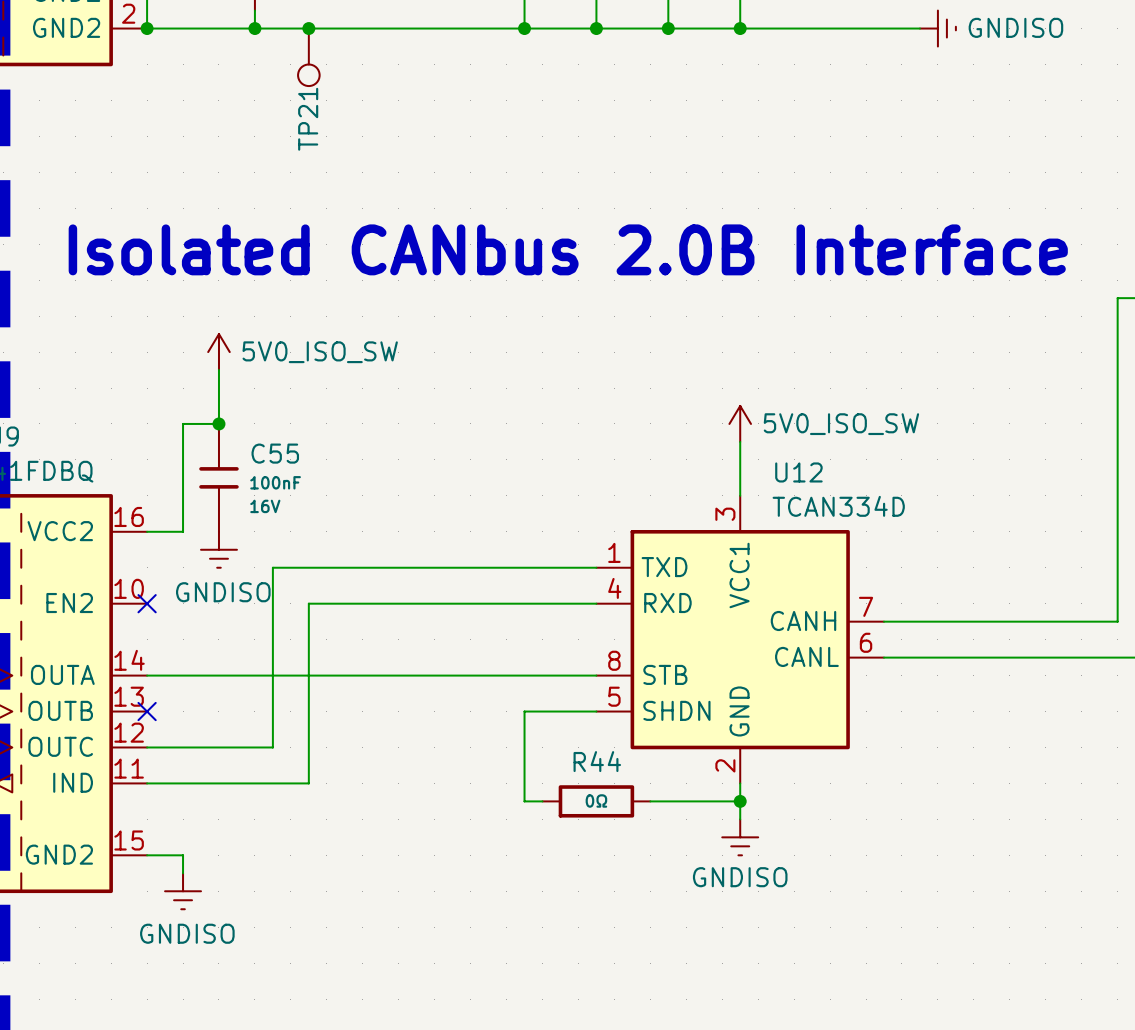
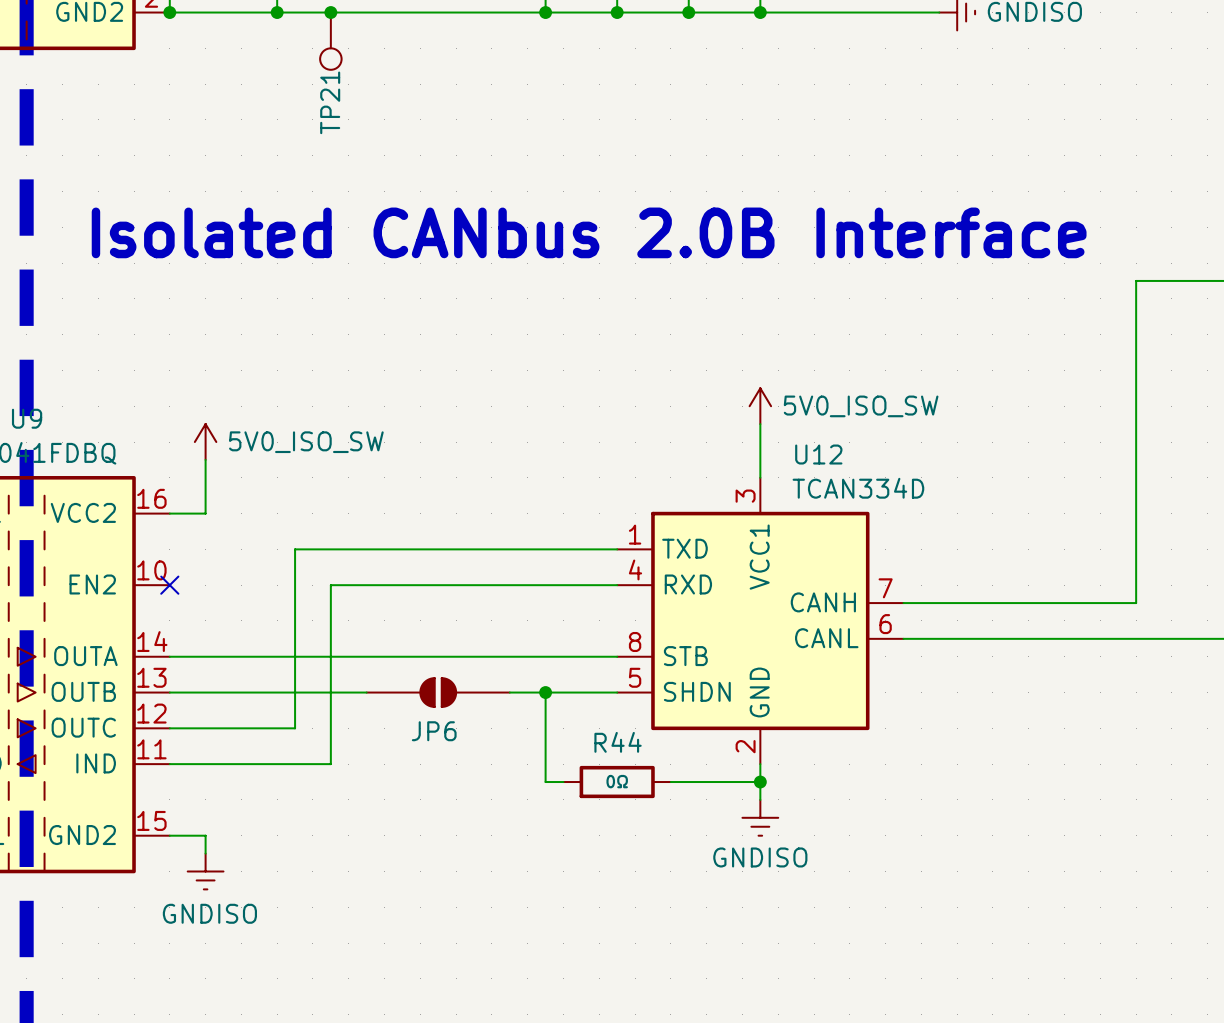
power symbol position: 5V0_ISO_SW (218, 352) -> 5V0_ISO_SW (205, 442)
wire: (218, 370) (218, 423) (183, 423) (183, 477) -> none
junction: (218, 423) -> none
C55: 100nF (218, 477) -> none
power symbol: GNDISO (218, 549) -> none
wire: none -> (169, 692) (366, 692)
no-connect mark: (147, 711) -> none
JP6: none -> (438, 692)
wire: none -> (509, 692) (545, 692)
junction: none -> (545, 692)

